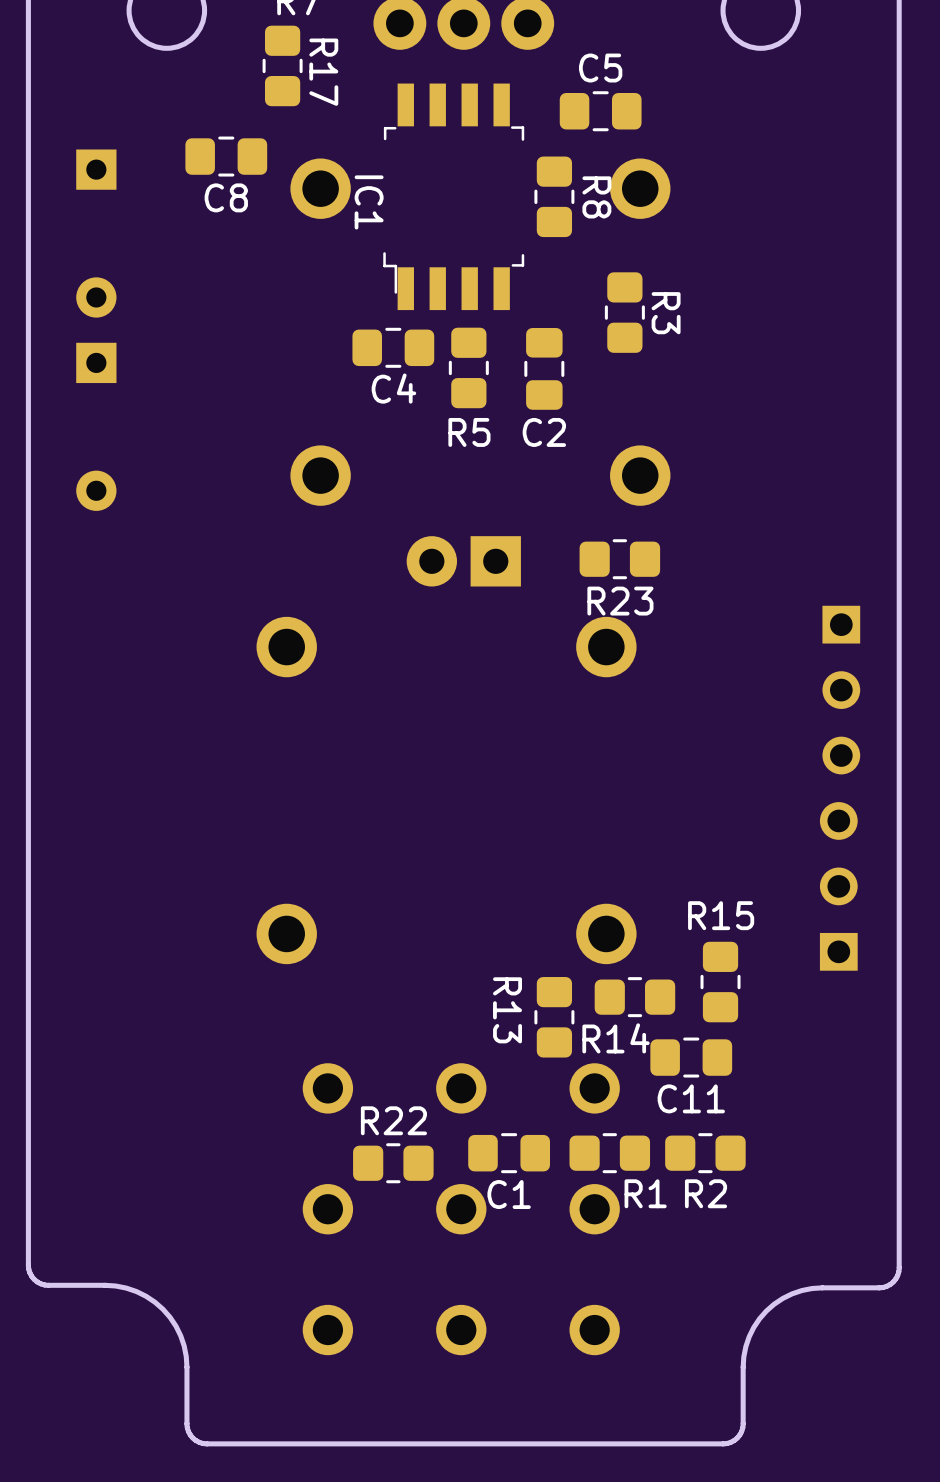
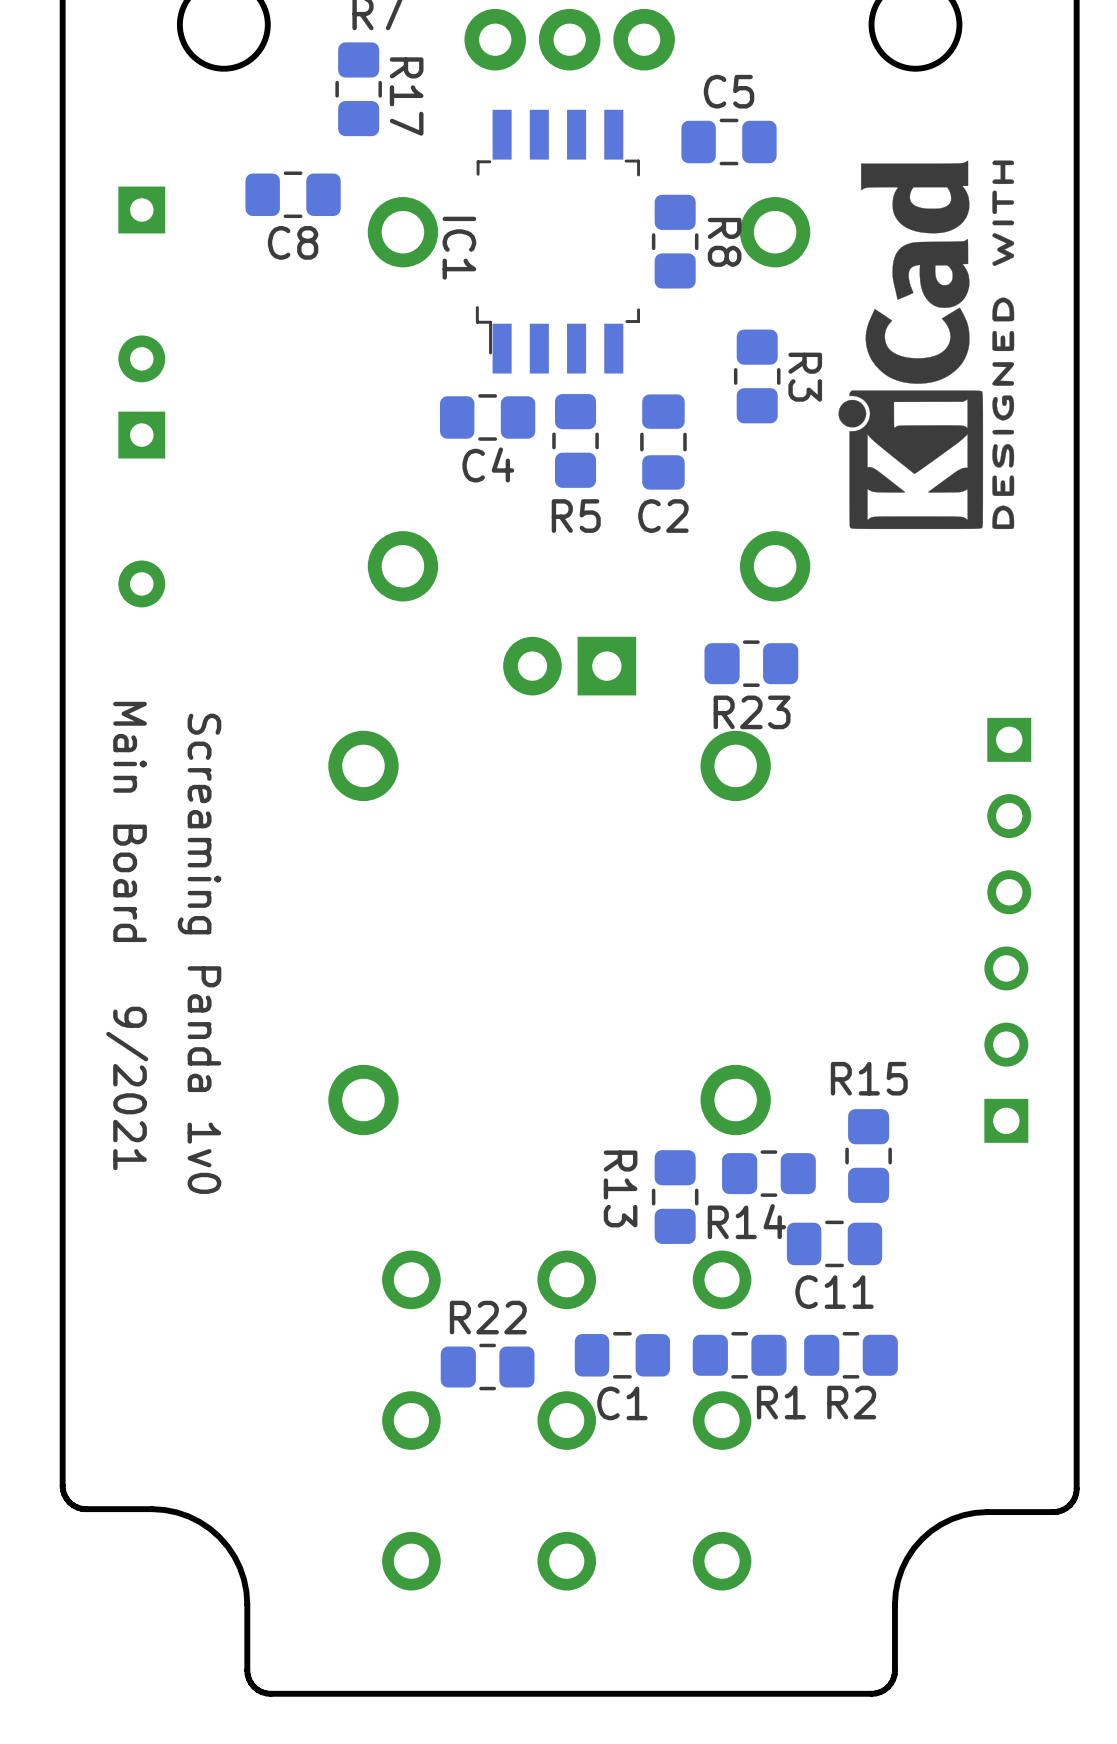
drawing: none -> [838, 160, 1015, 530]
text: none -> Main Board (130, 821)
text: none -> Screaming Panda 1v0 (199, 953)
text: none -> 9/2021 (127, 1088)

